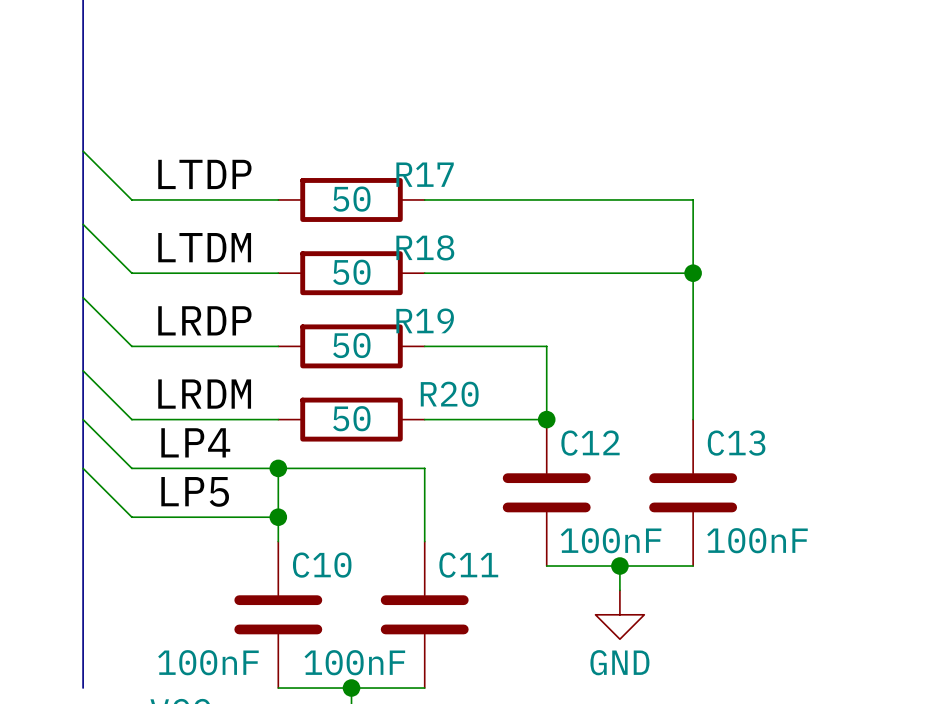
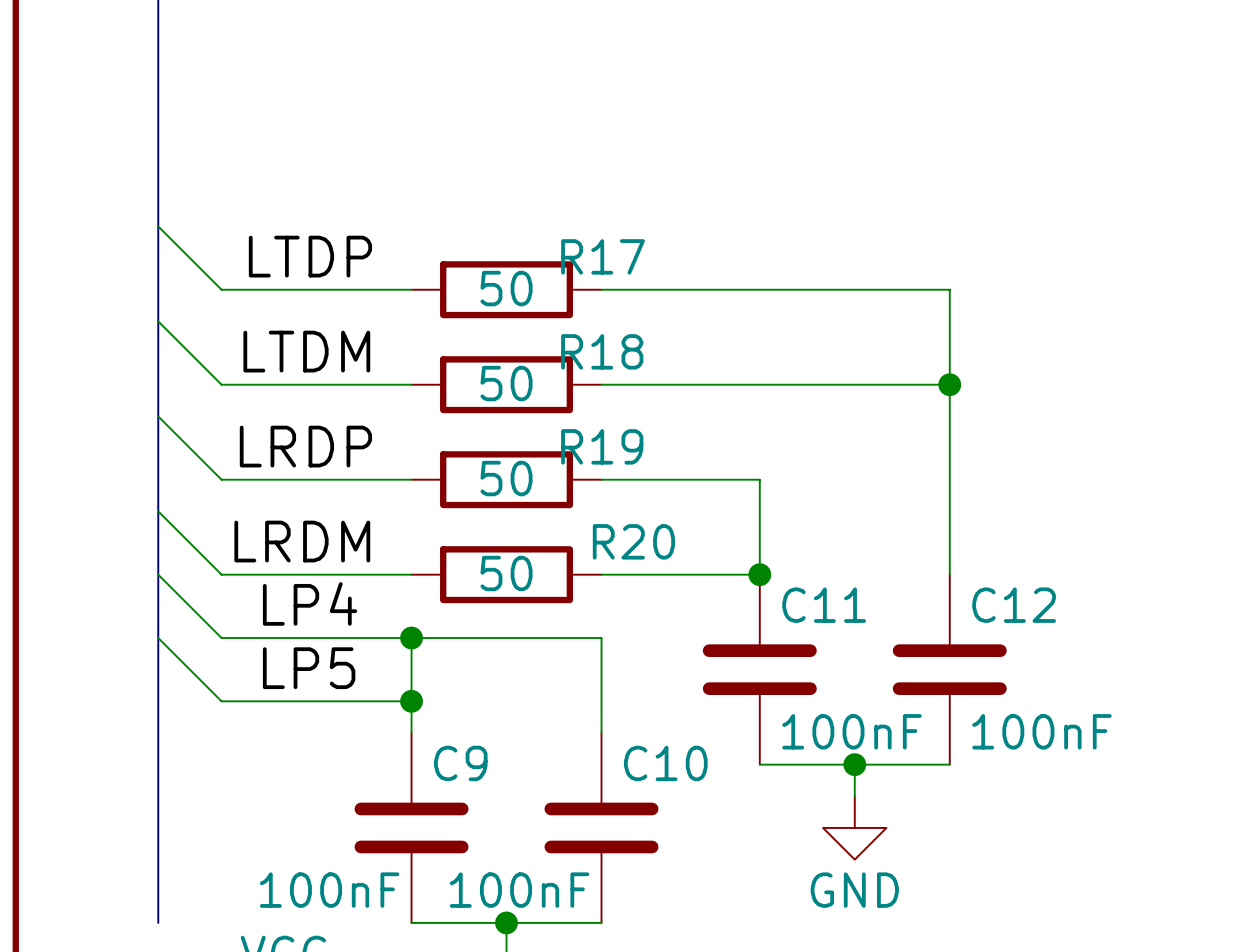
C12 name: C12 (590, 443) -> C11 (824, 605)
C13 name: C13 (736, 443) -> C12 (1014, 605)
C10 name: C10 (322, 565) -> C9 (460, 763)
C11 name: C11 (468, 565) -> C10 (665, 763)

